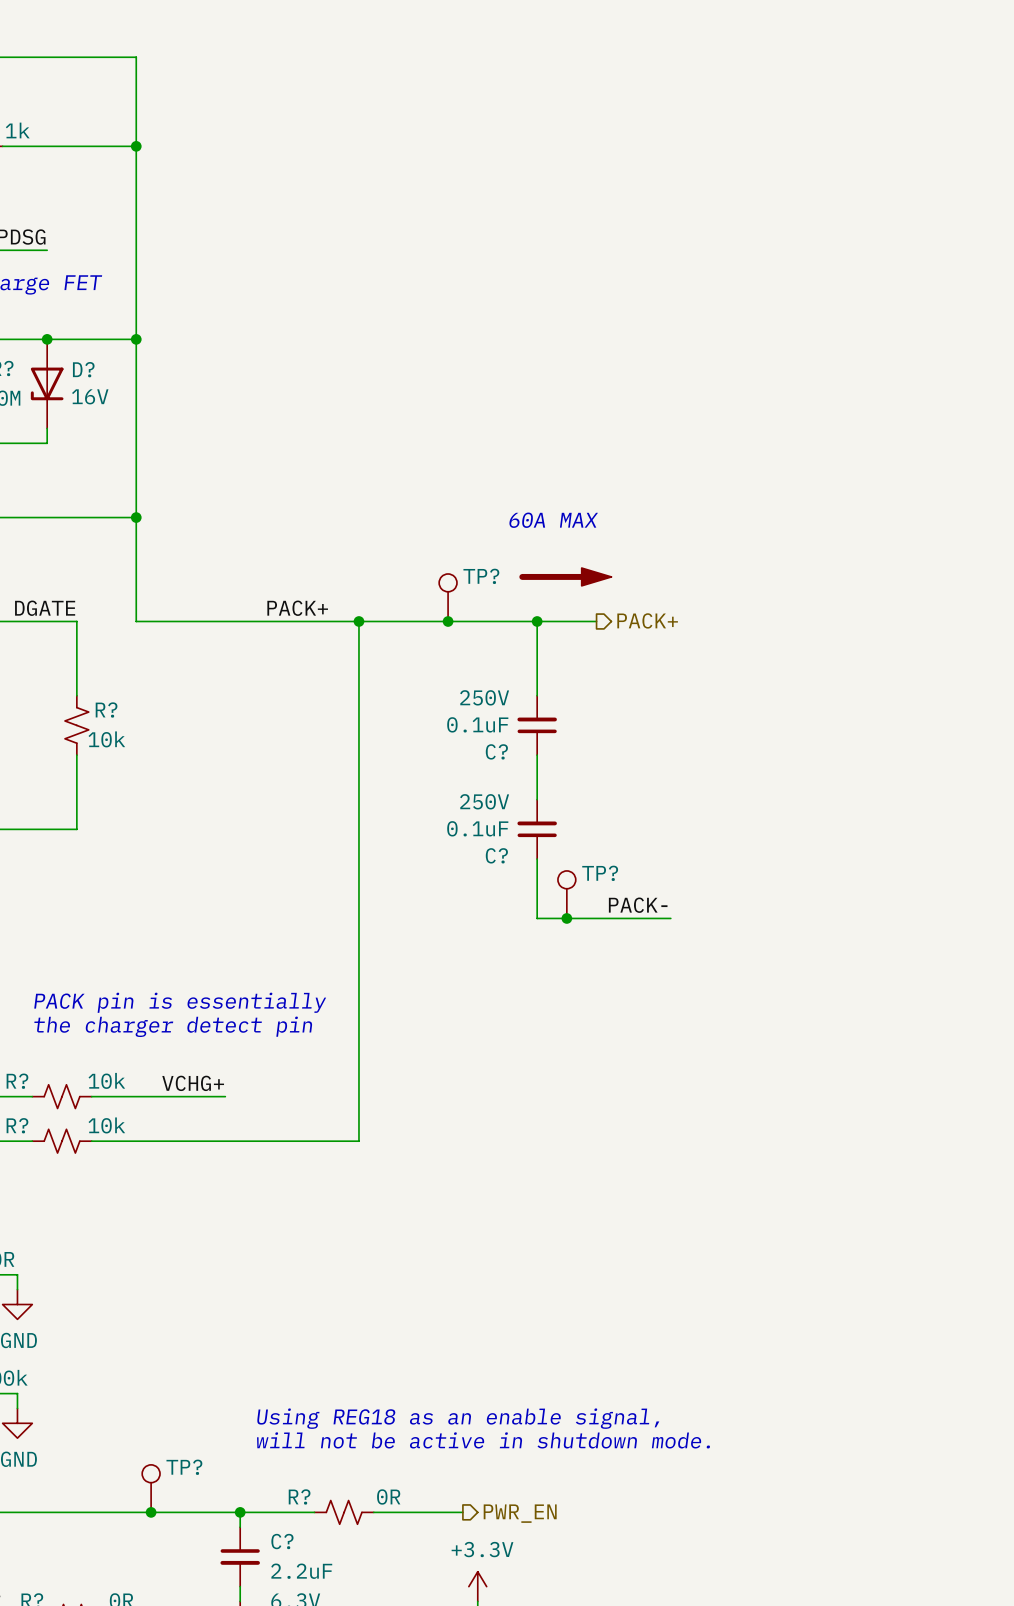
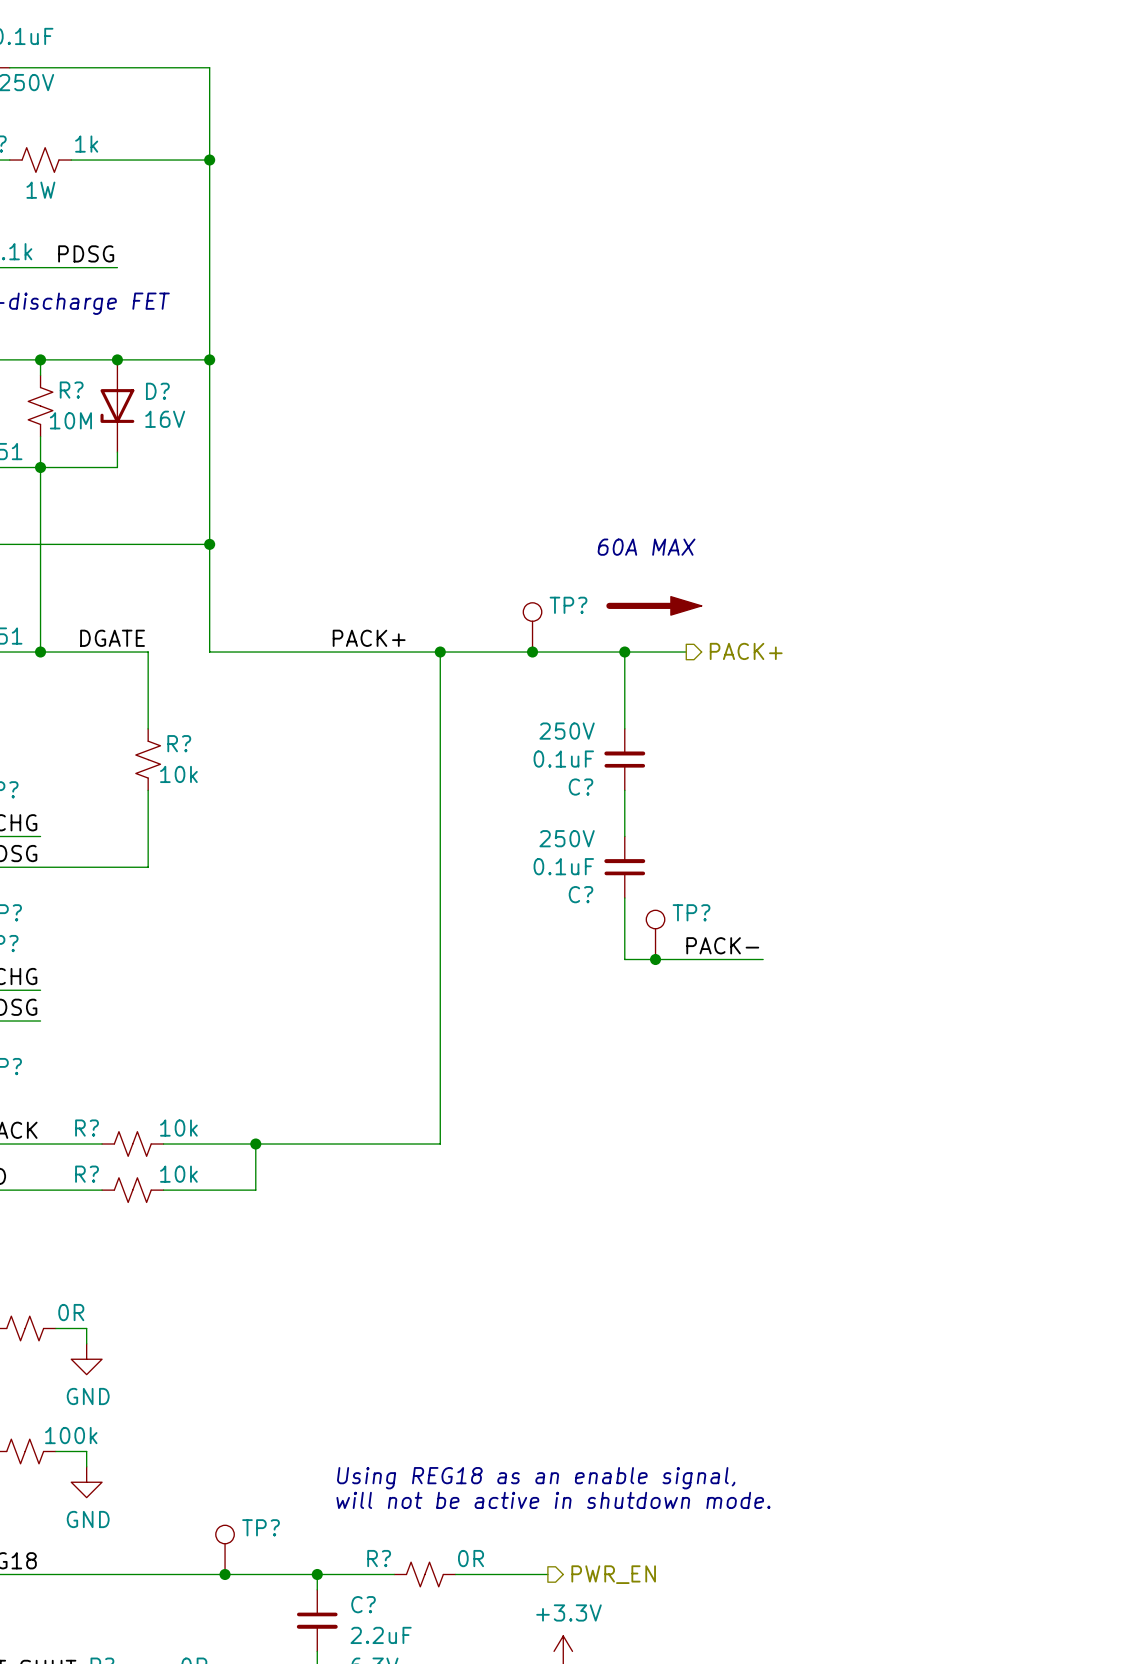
text: PACK pin is essentially (180, 1002) -> none
text: the charger detect pin (173, 1026) -> none
label: VCHG+ (193, 1083) -> none
wire: none -> (255, 1144) (255, 1190)
junction: none -> (255, 1144)
wire: (358, 1096) (358, 1141) (180, 1141) -> (440, 1144) (301, 1144)

